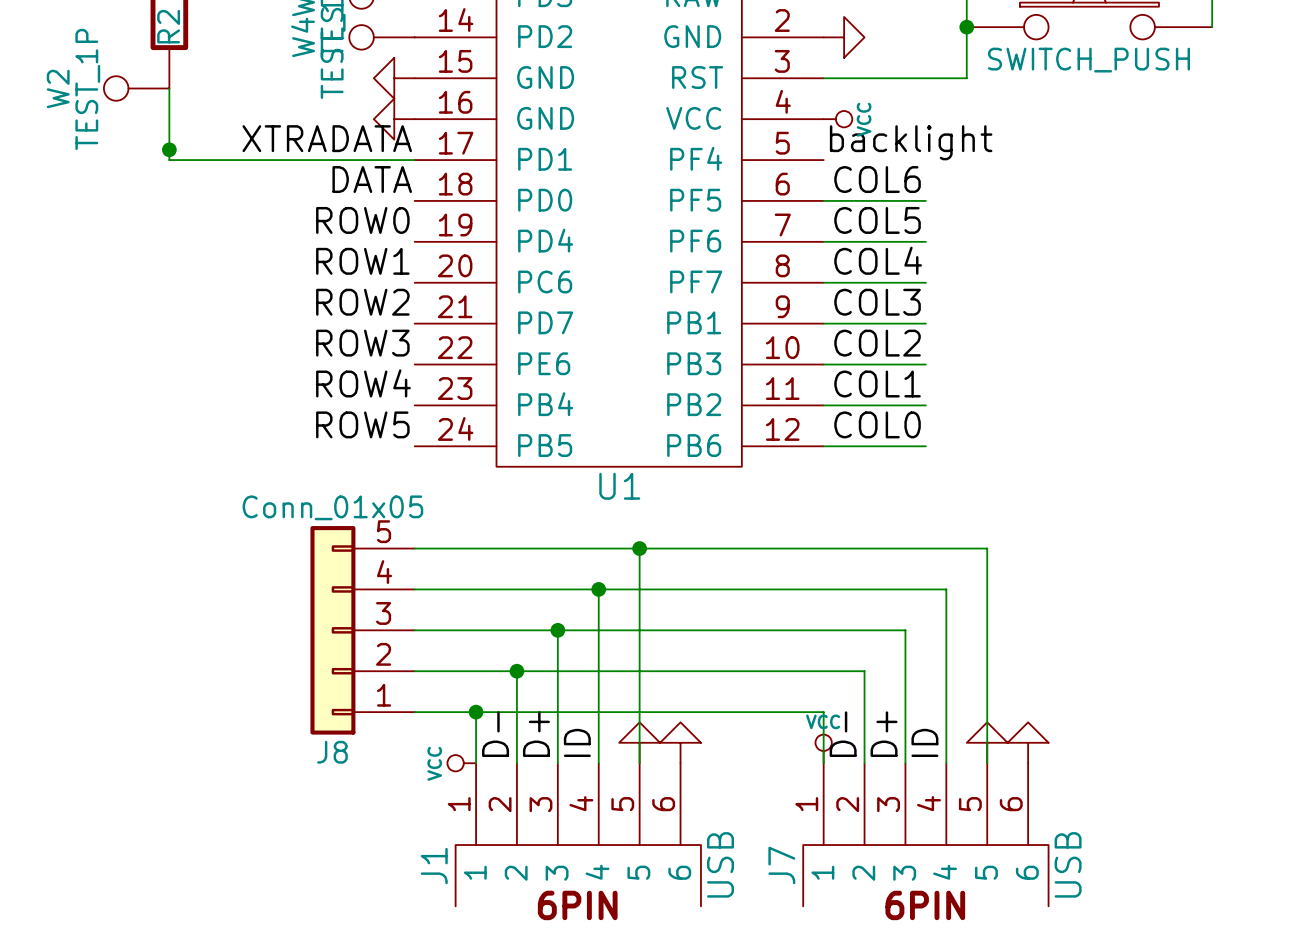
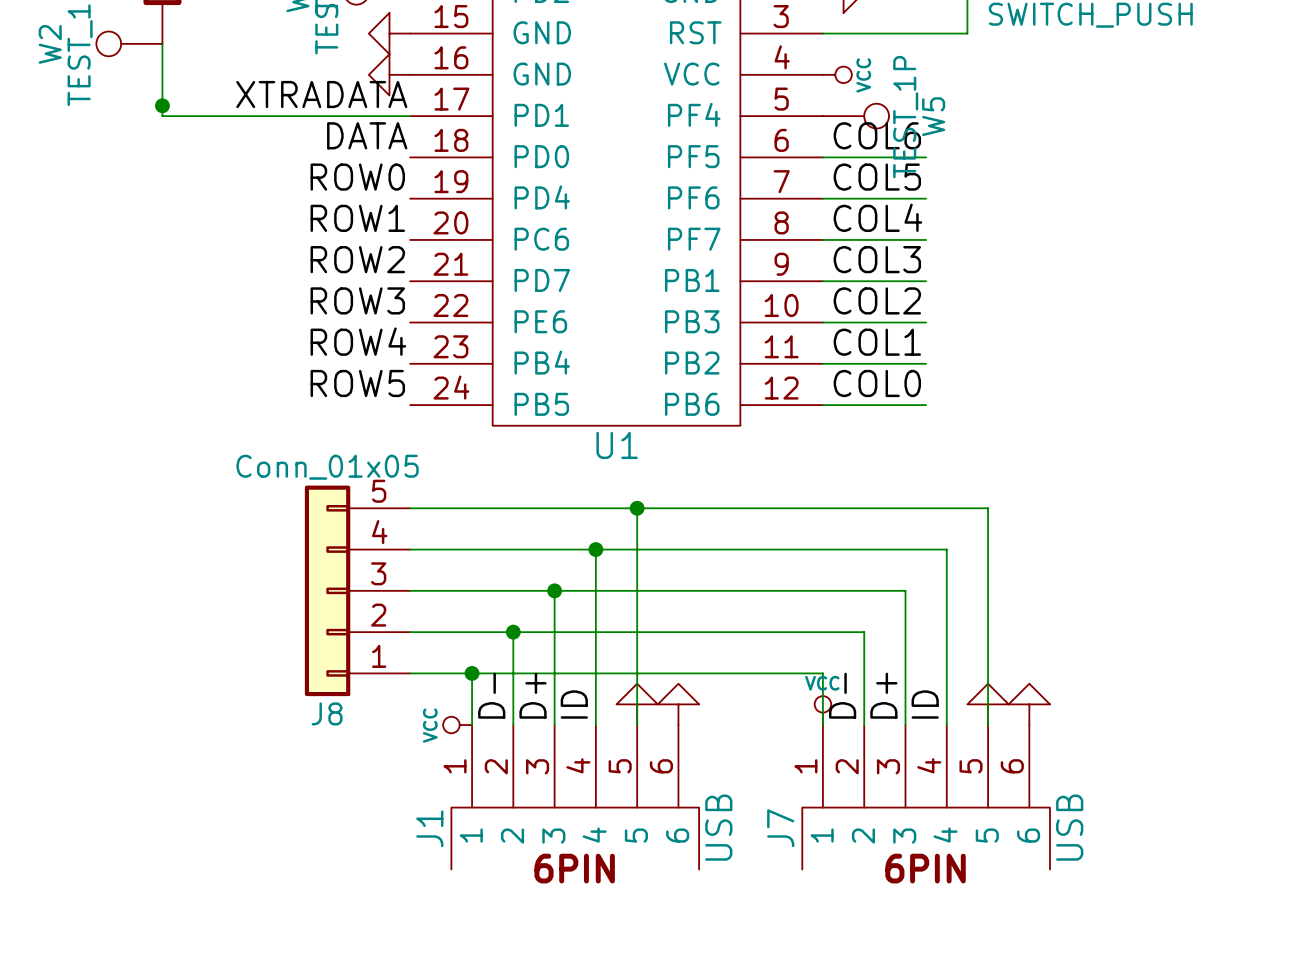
label: backlight (911, 142) -> none
W5: none -> TEST_1P (855, 116)

